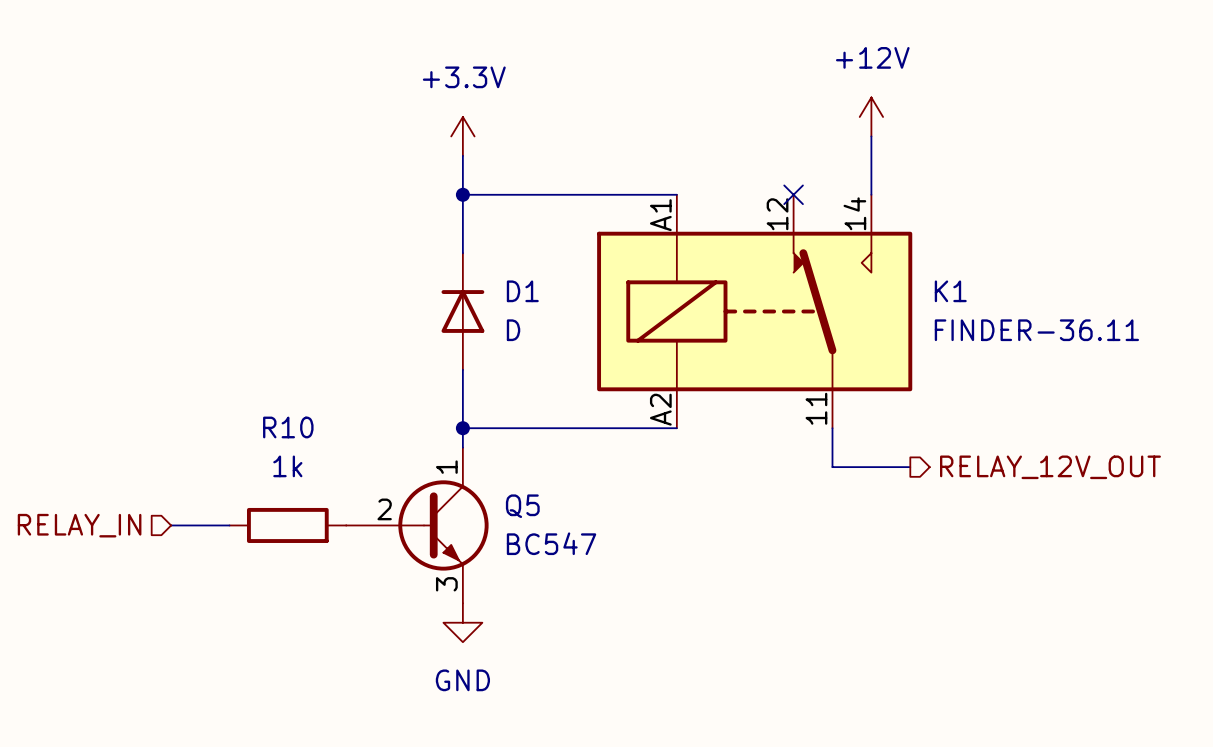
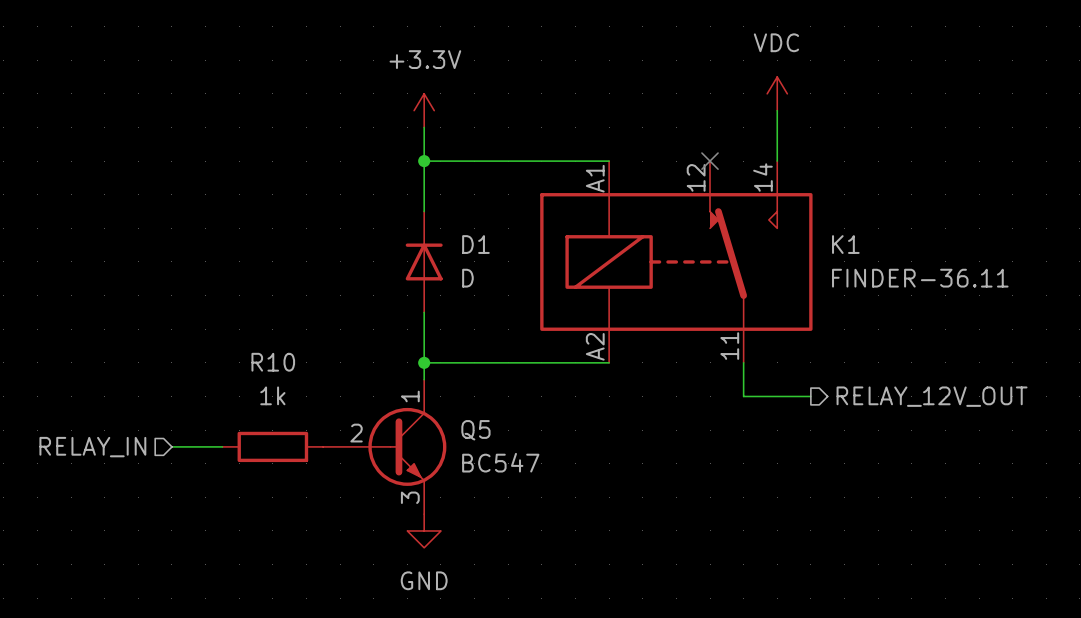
power symbol: +12V (871, 116) -> VDC (777, 93)

